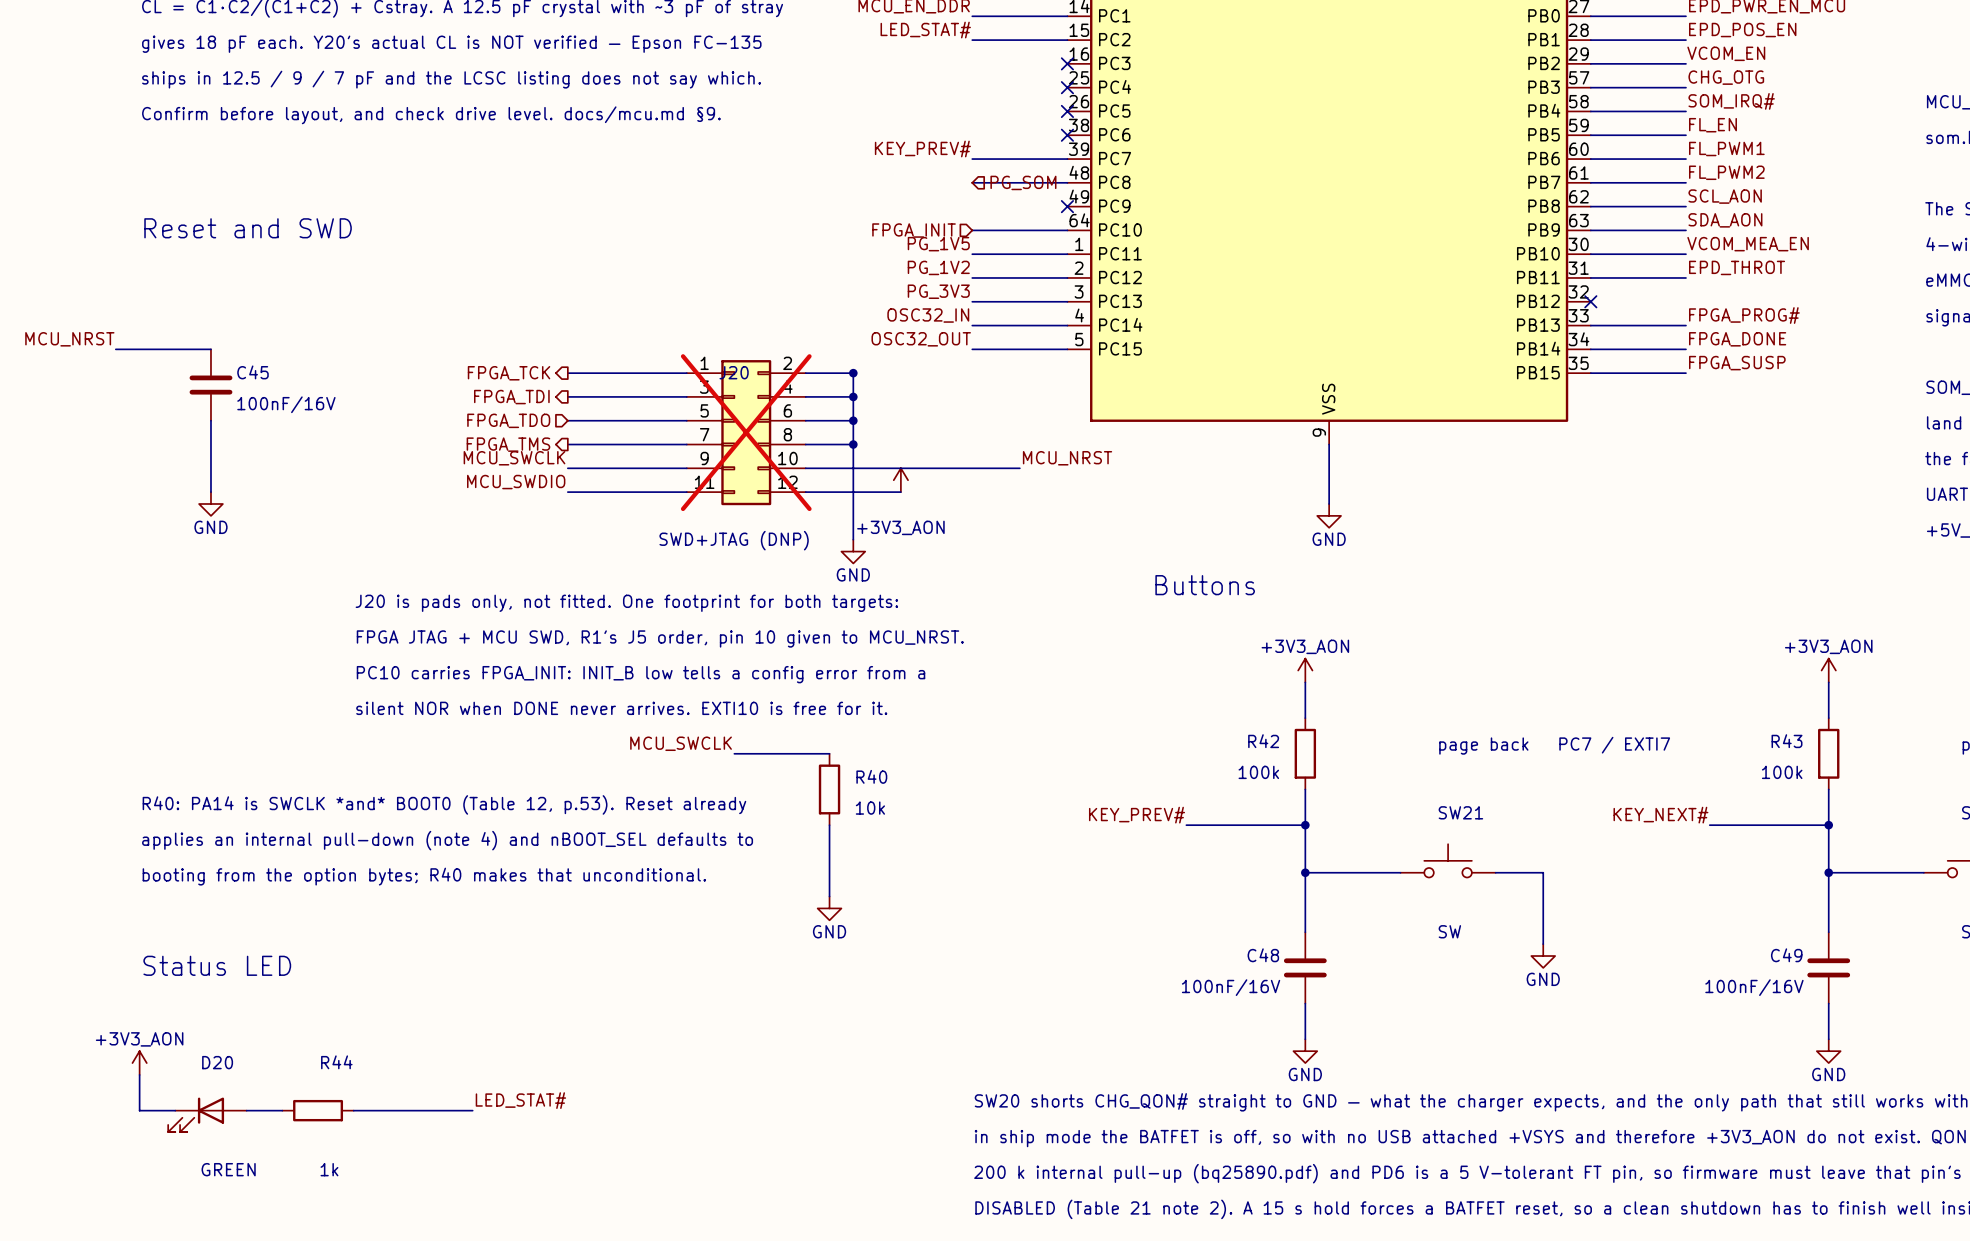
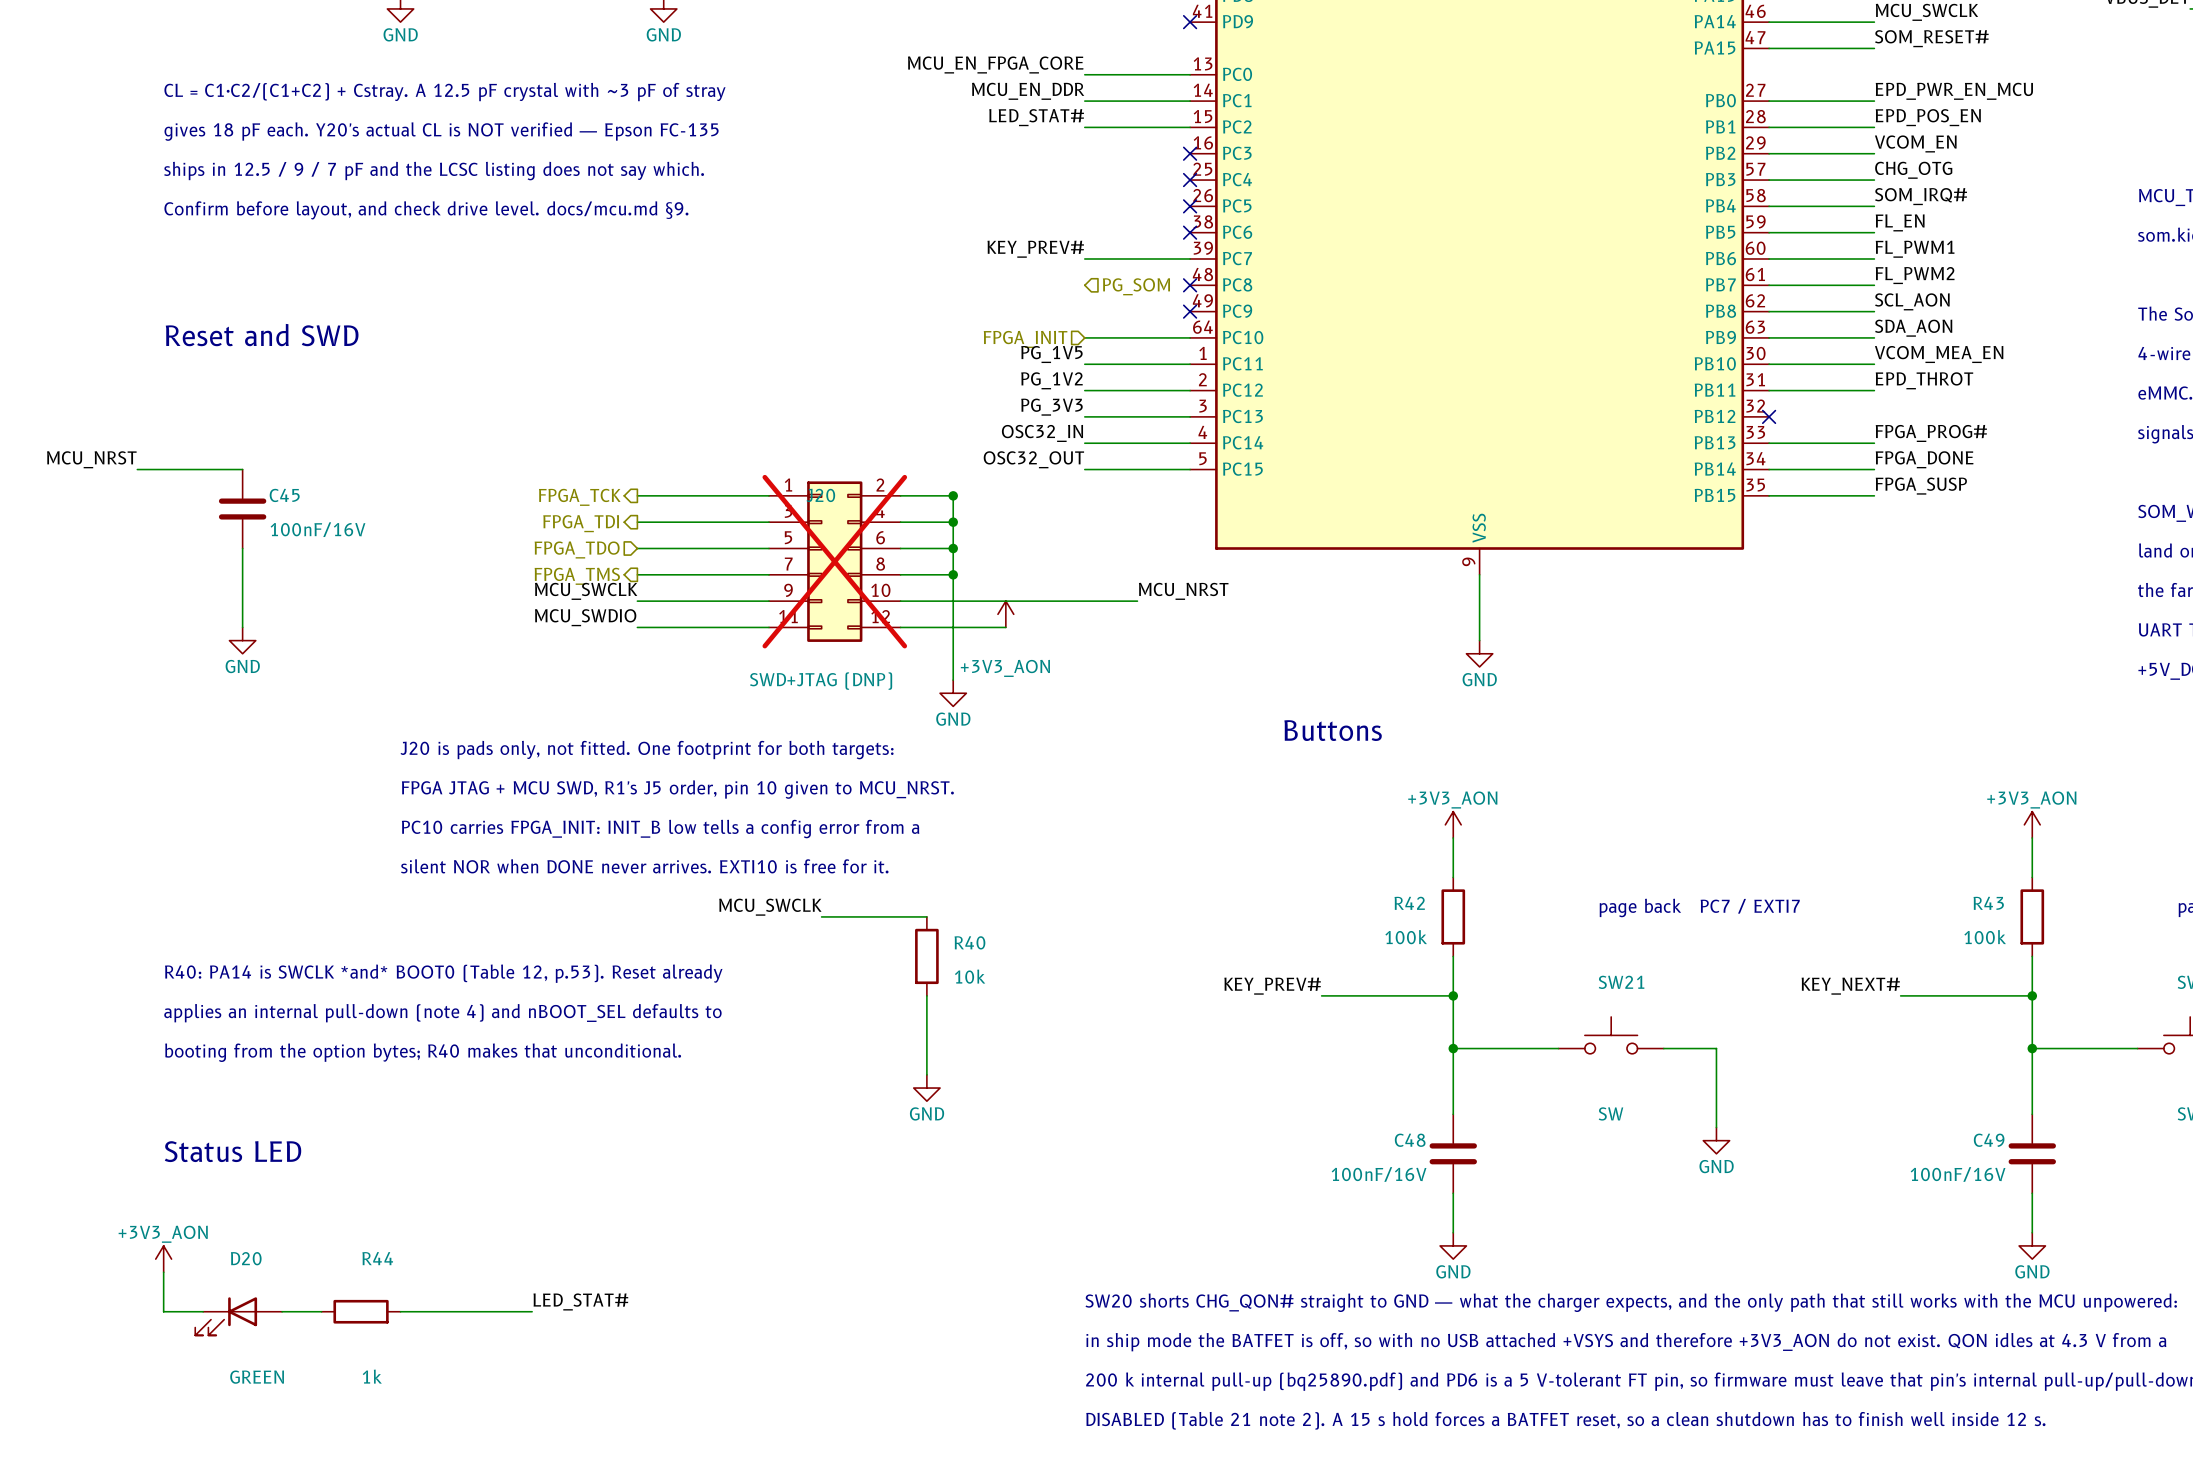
wire: (972, 182) (1067, 182) -> none
no-connect mark: none -> (1190, 285)

